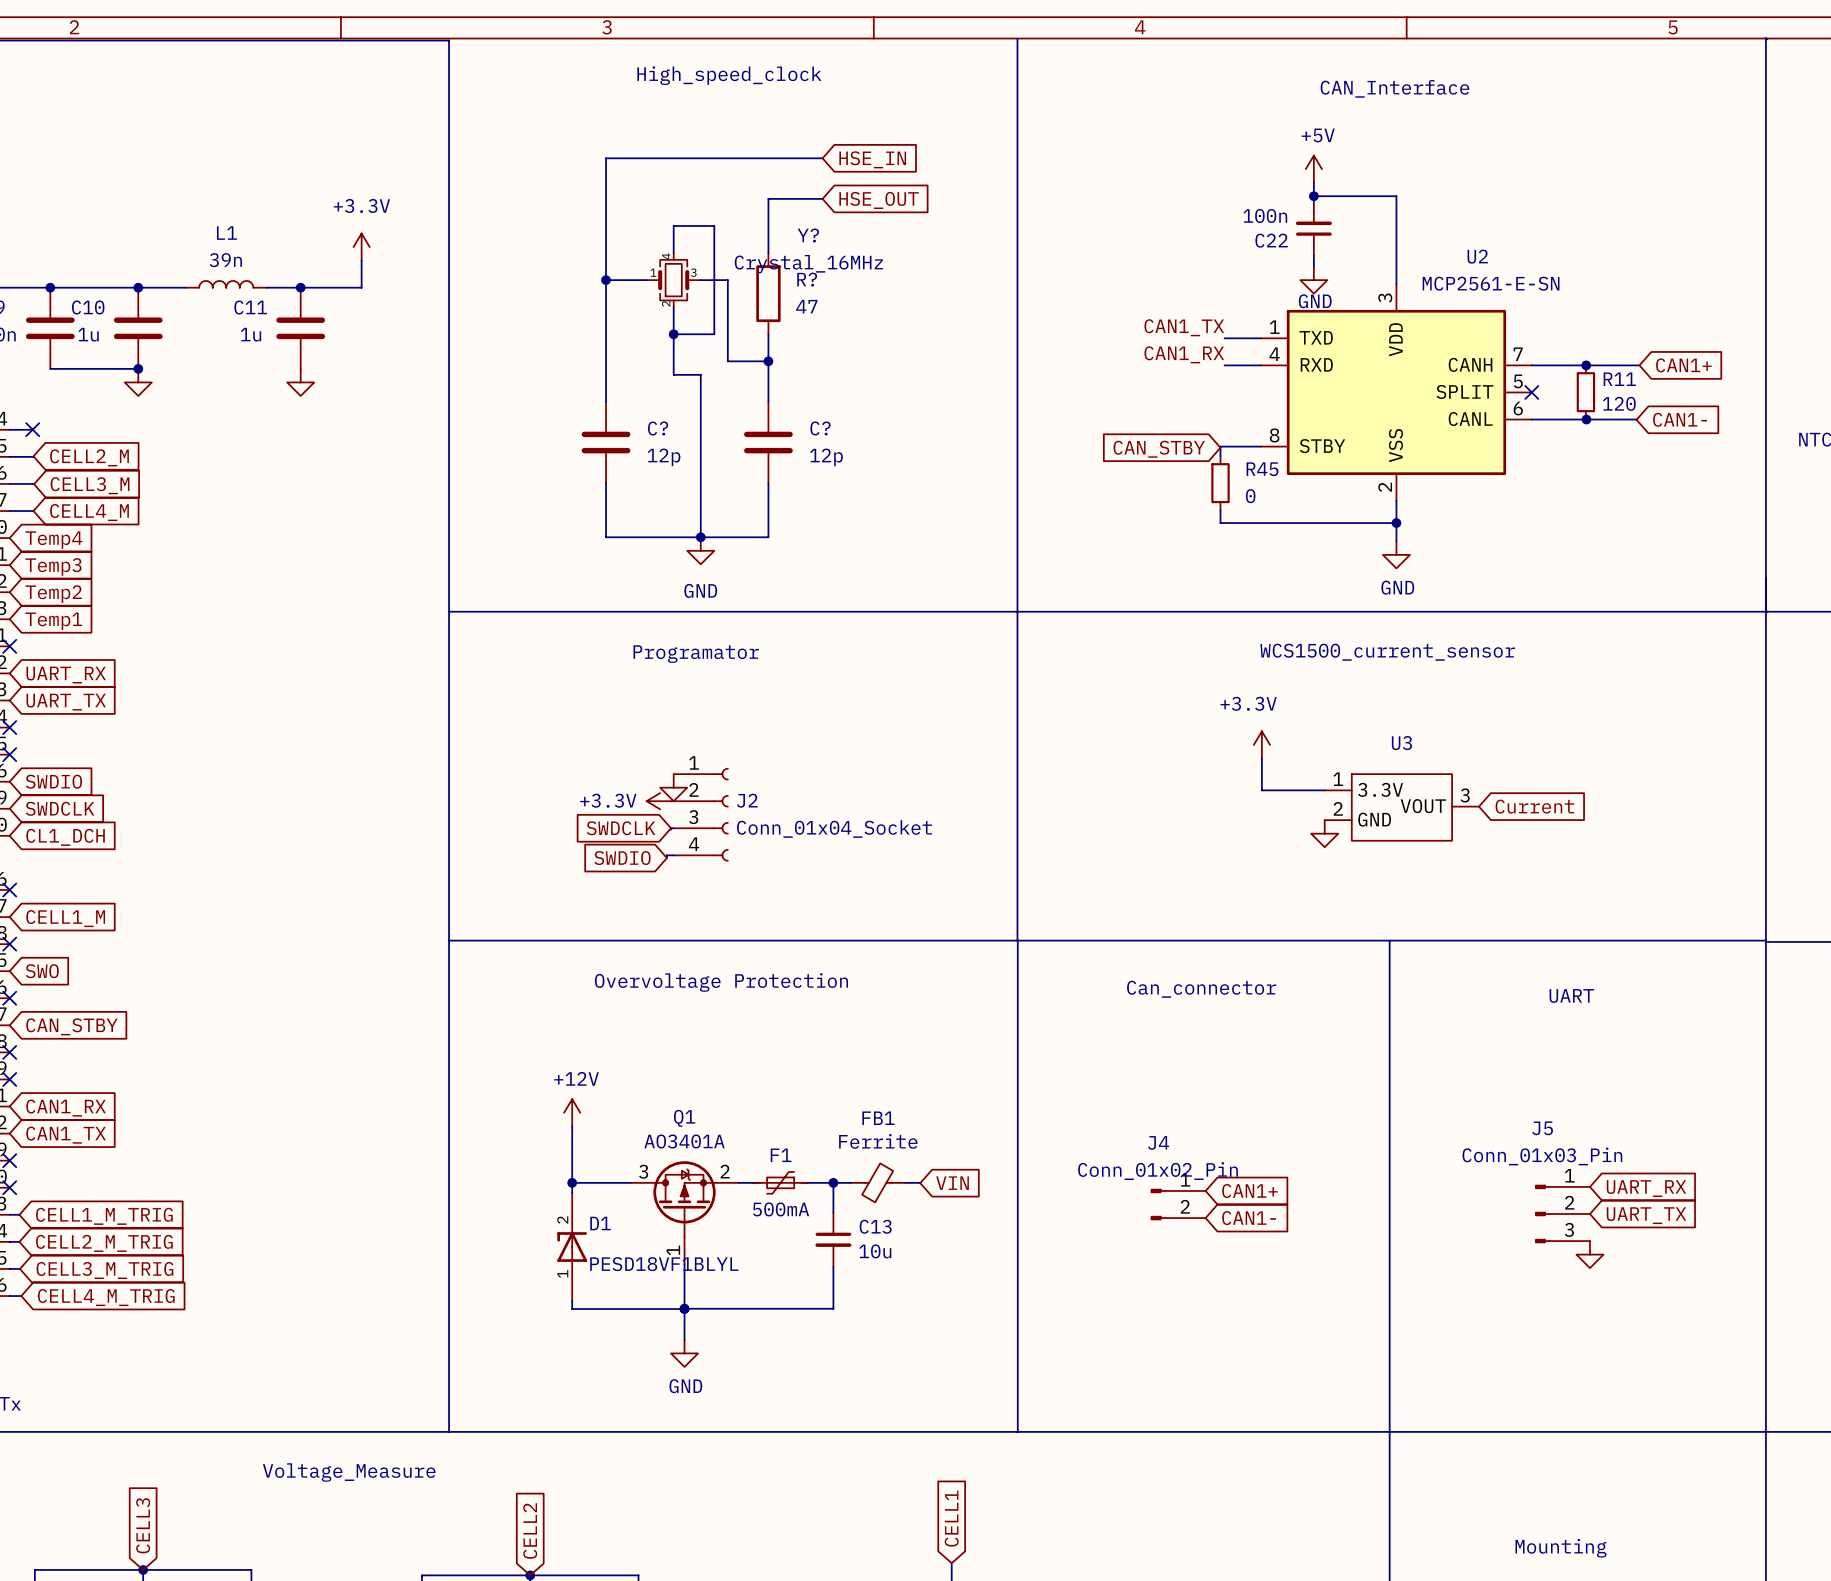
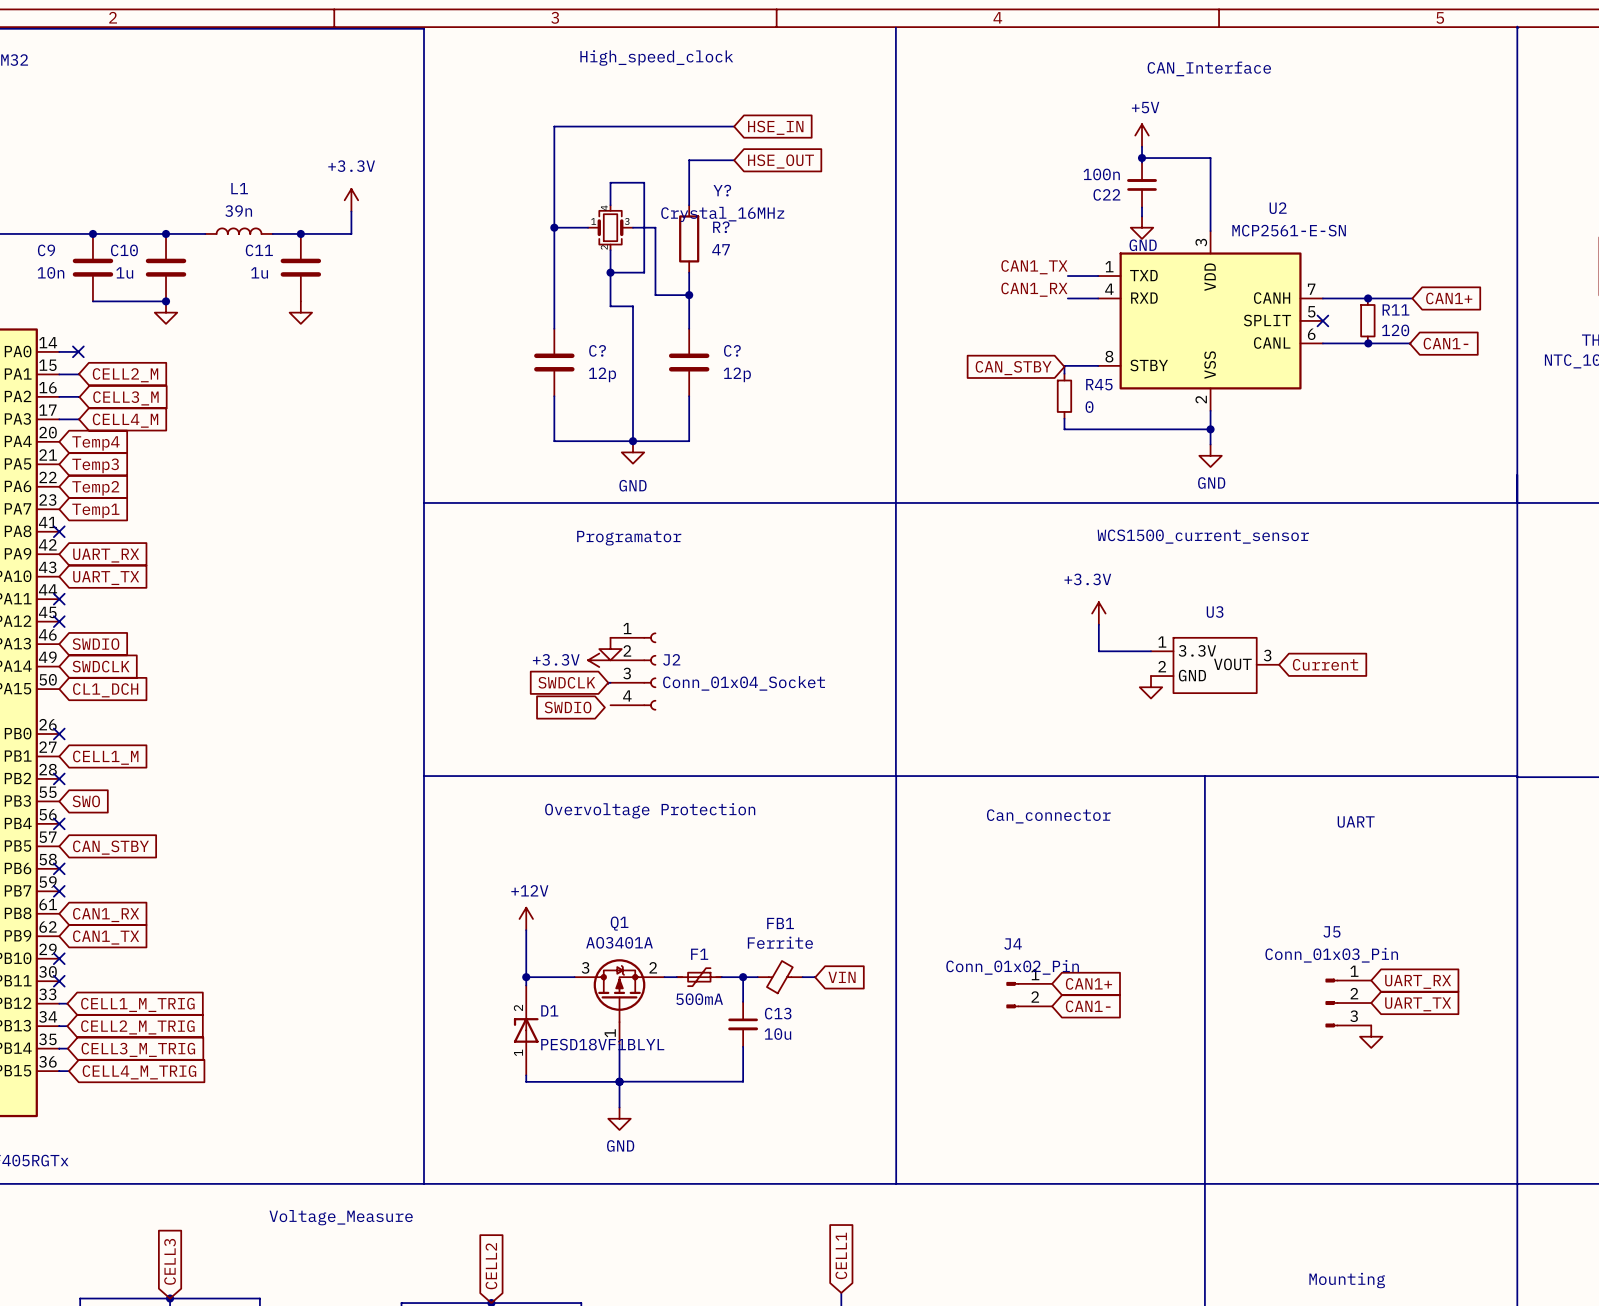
wire: (673, 855) (666, 855) (666, 858) -> none

